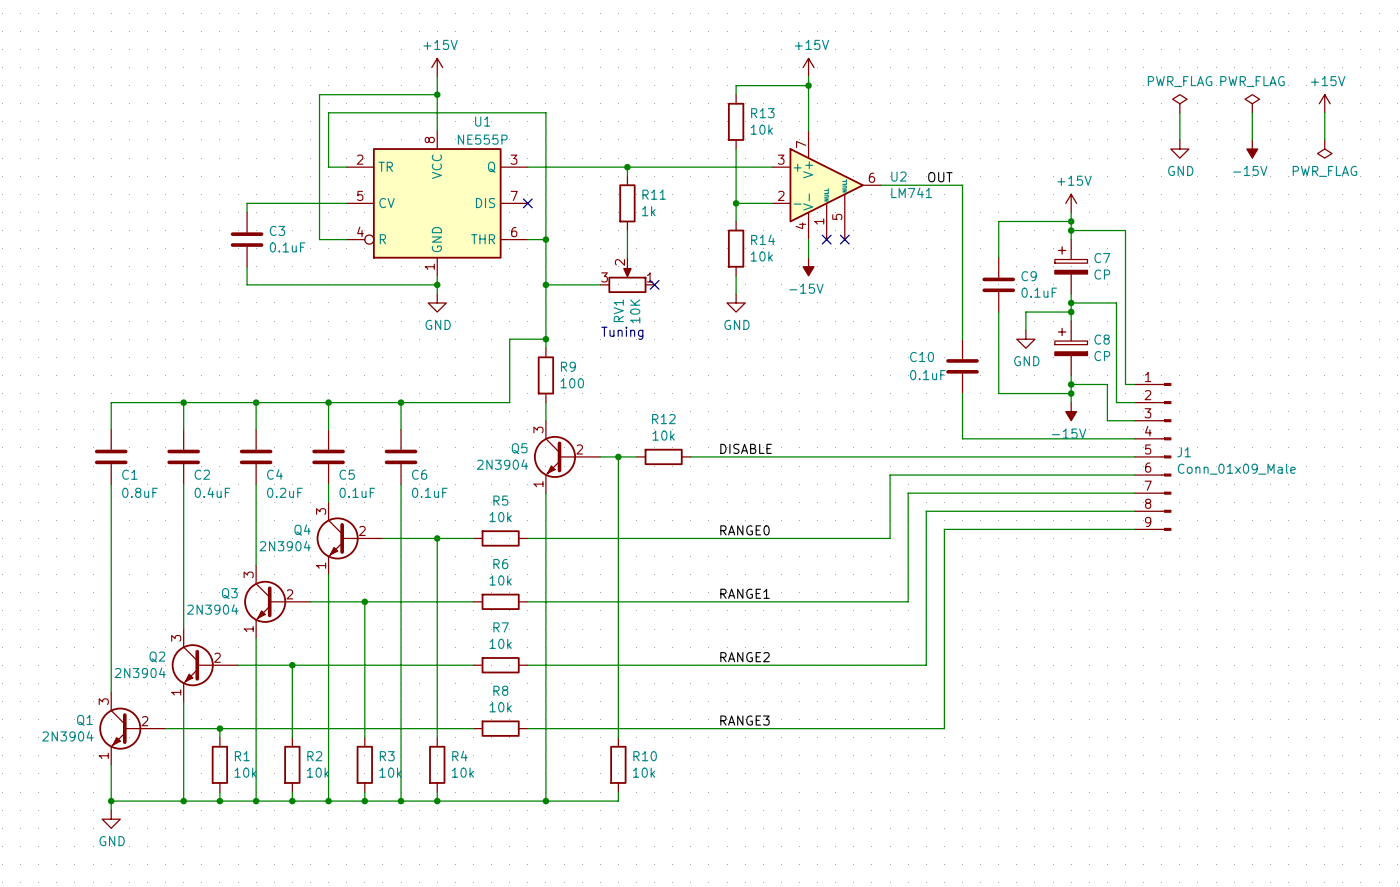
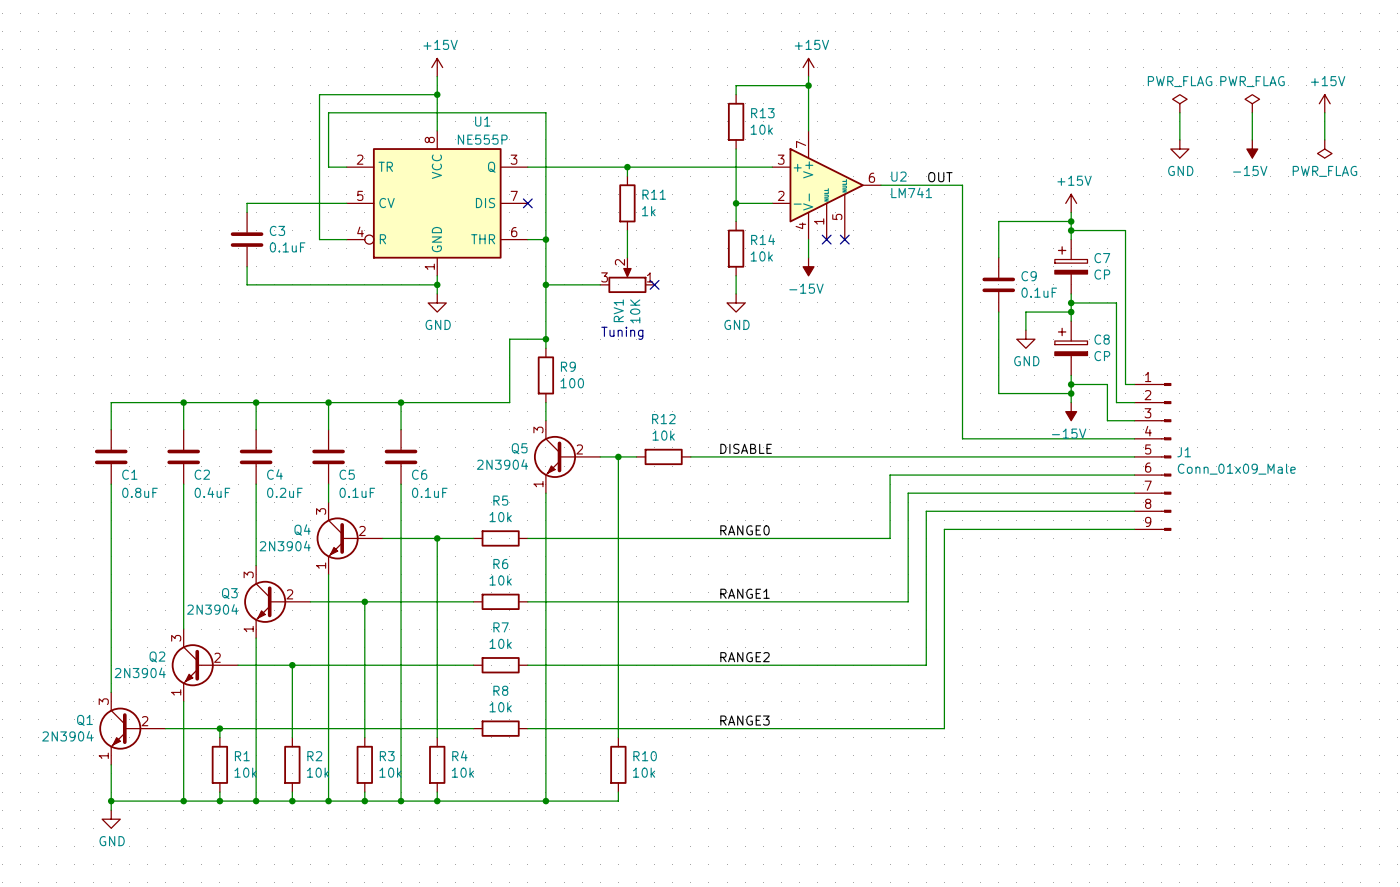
C10: 0.1uF (962, 366) -> none

